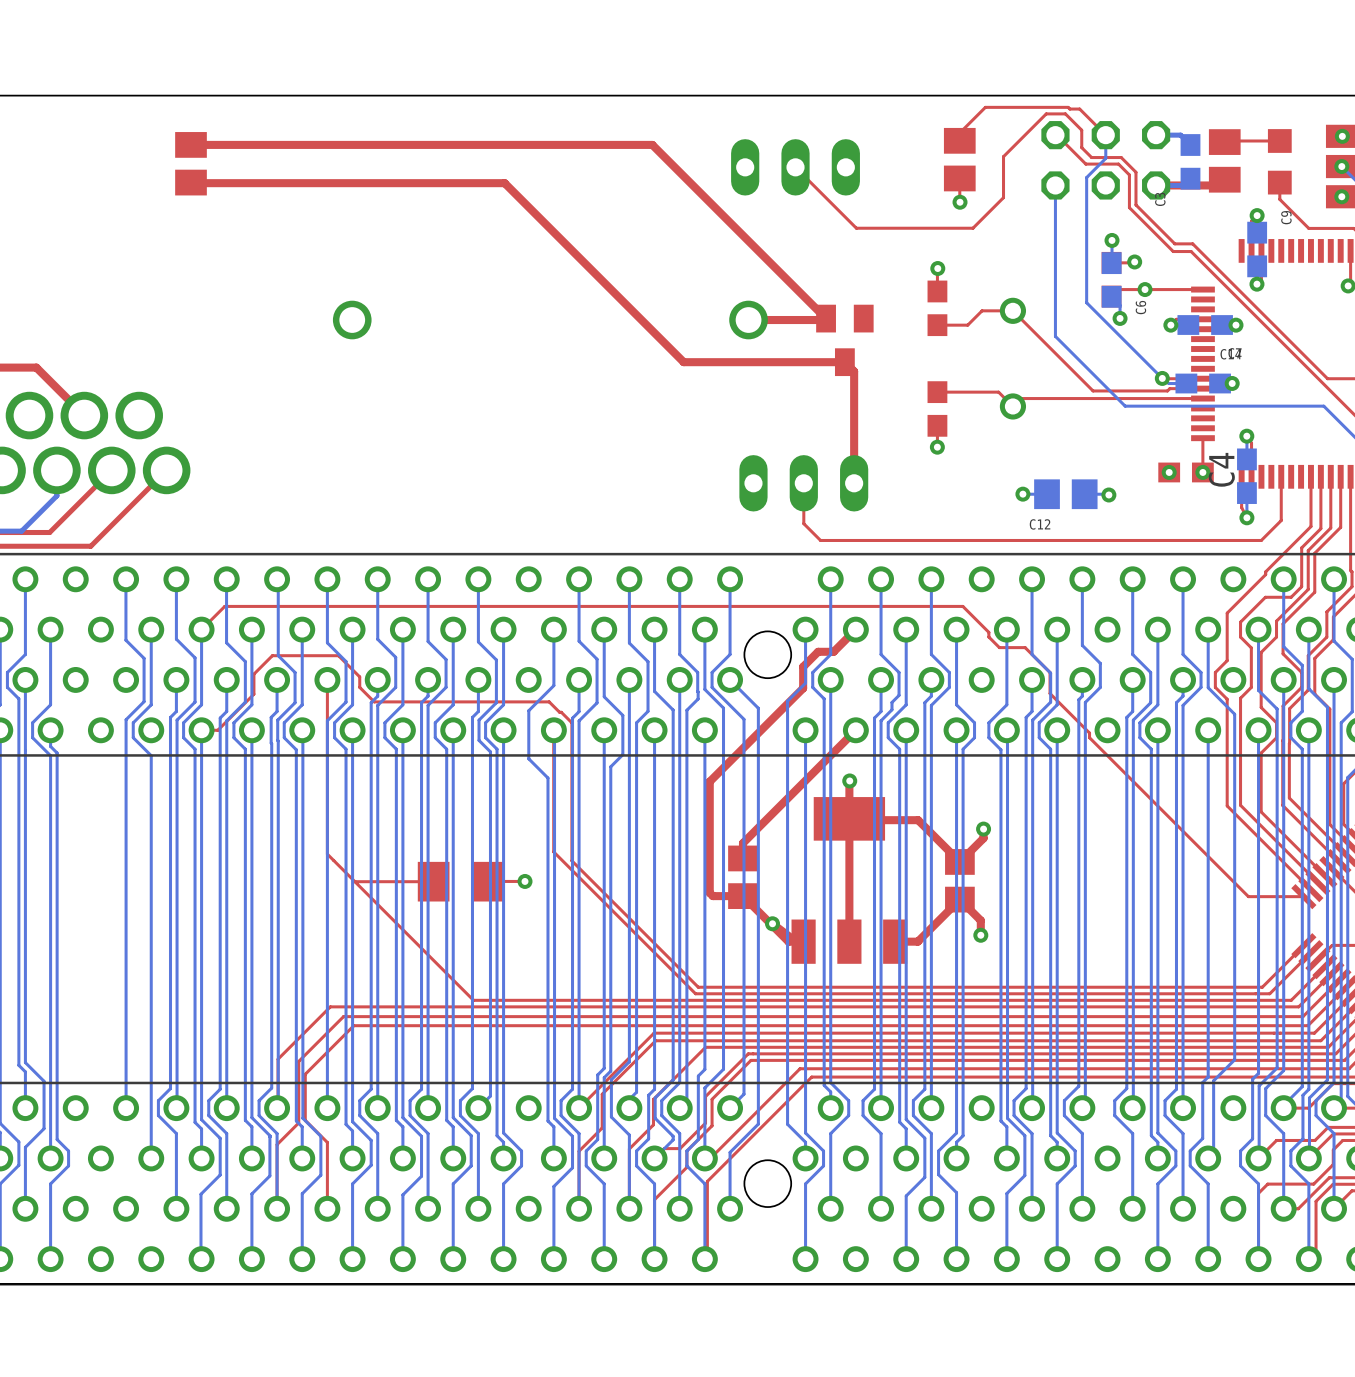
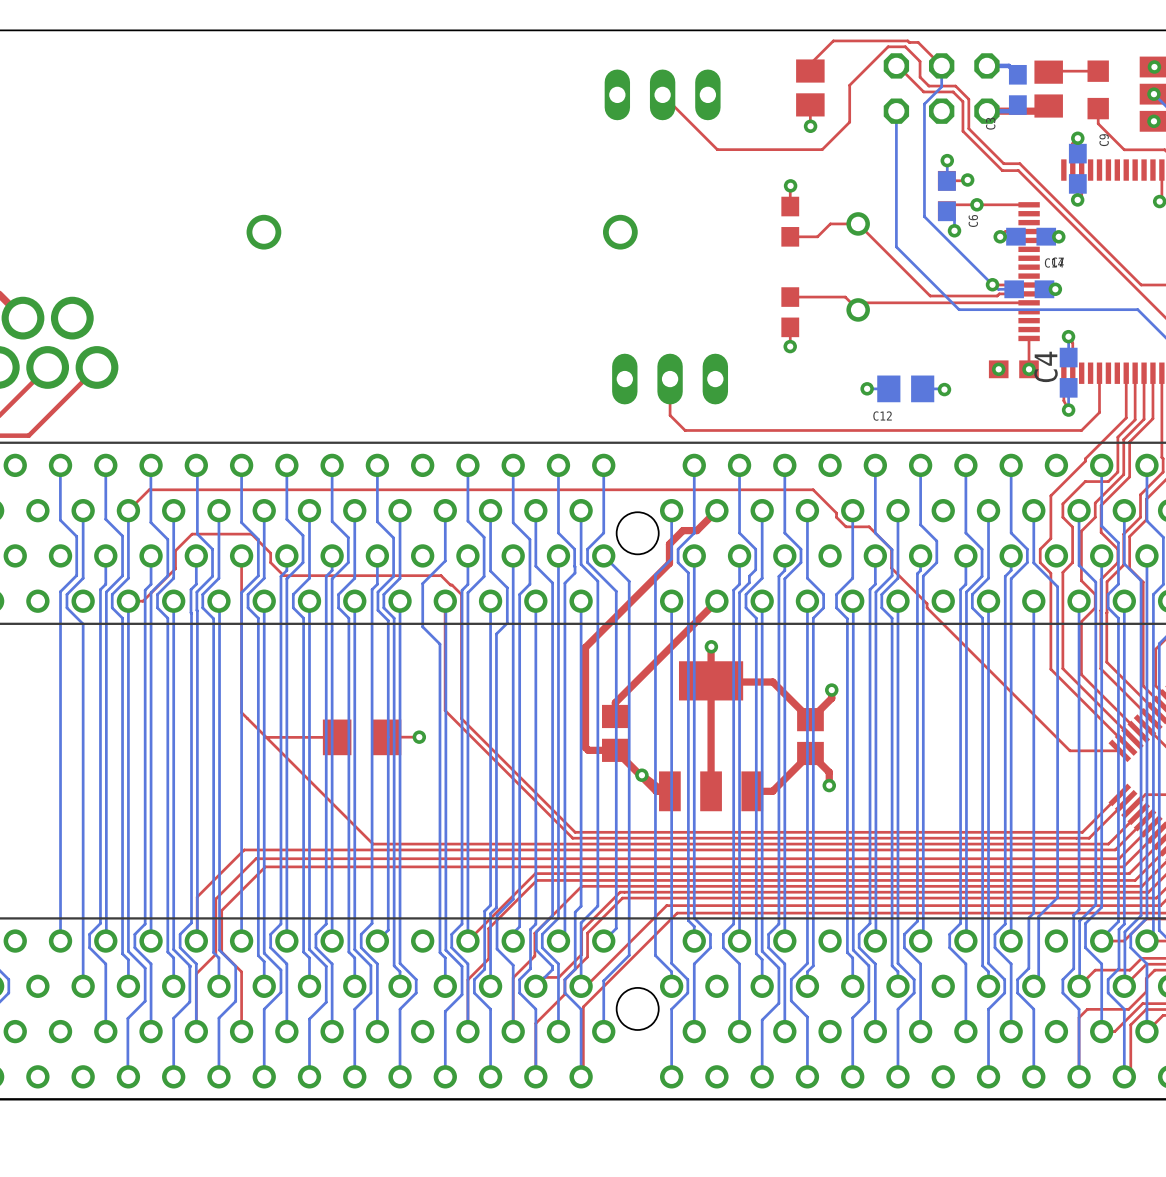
top track: (191, 144) (652, 144) (826, 318) (748, 320) -> none
part: (191, 163) -> none
top track: (191, 182) (504, 183) (683, 362) (844, 362) (854, 371) (854, 483) -> none
part: (844, 340) -> none

